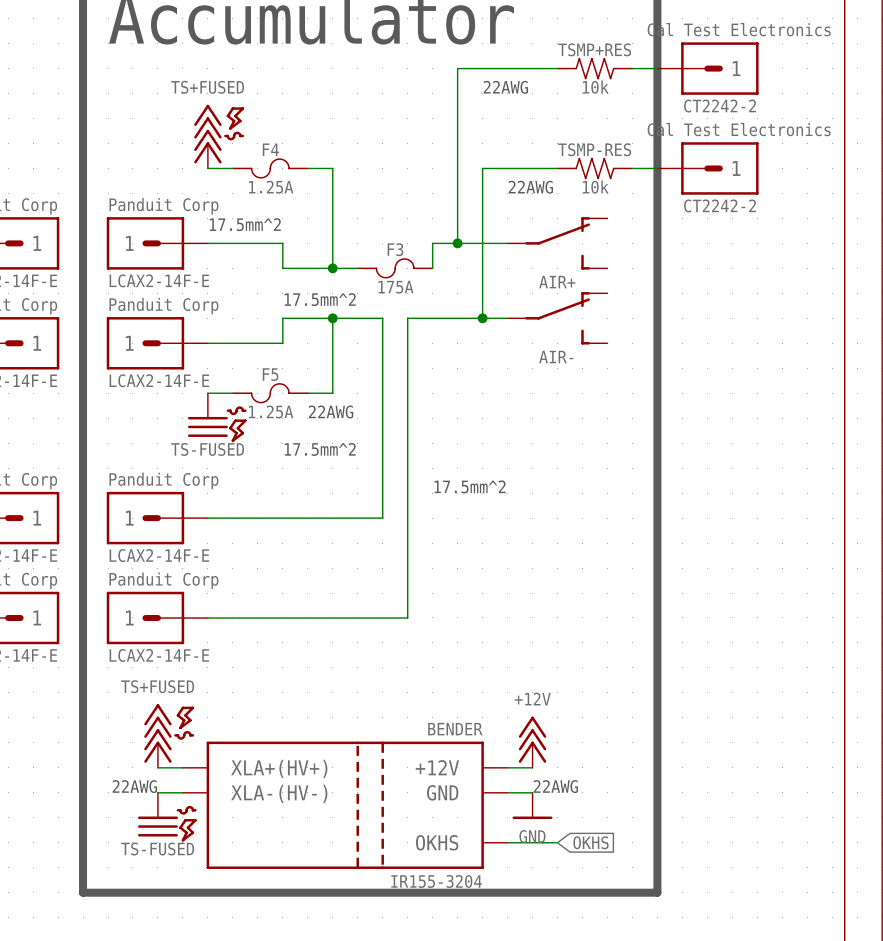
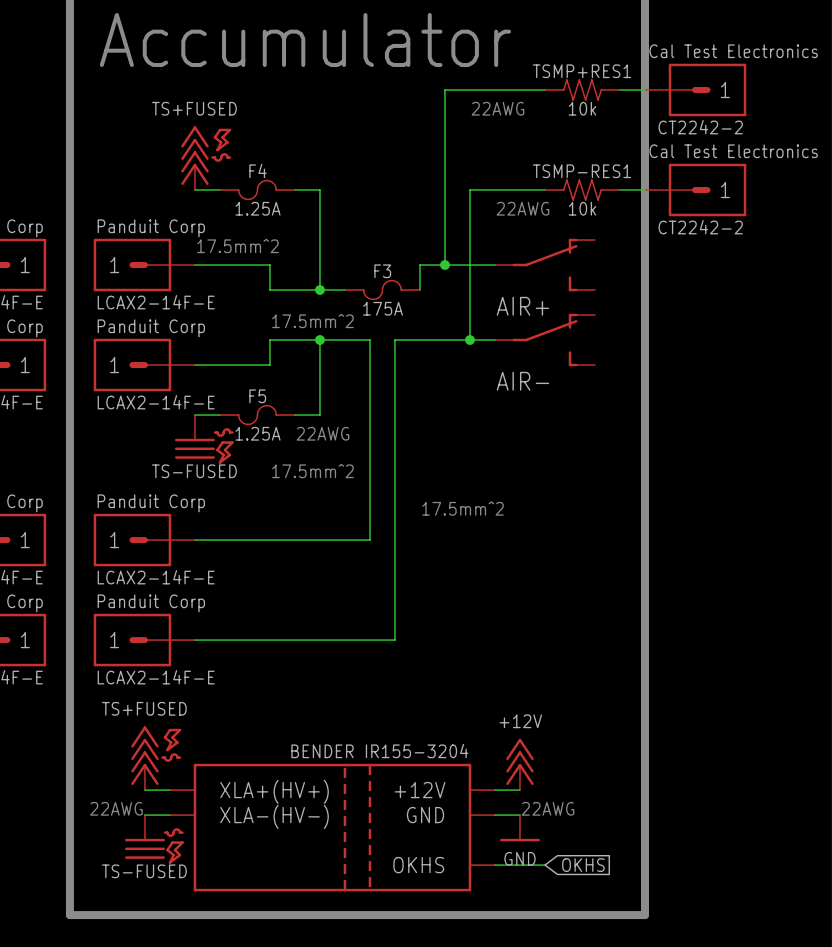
TSMP+RES name: TSMP+RES (594, 49) -> TSMP+RES1 (581, 71)
TSMP-RES name: TSMP-RES (594, 149) -> TSMP-RES1 (581, 171)
AIR+ text: AIR+ (557, 282) -> none
AIR+ name: none -> AIR+ (522, 306)
AIR- text: AIR- (556, 357) -> none
AIR- name: none -> AIR- (522, 381)
part text: BENDER (455, 729) -> BENDER IR155-3204 (379, 751)
part text: IR155-3204 (436, 881) -> none

